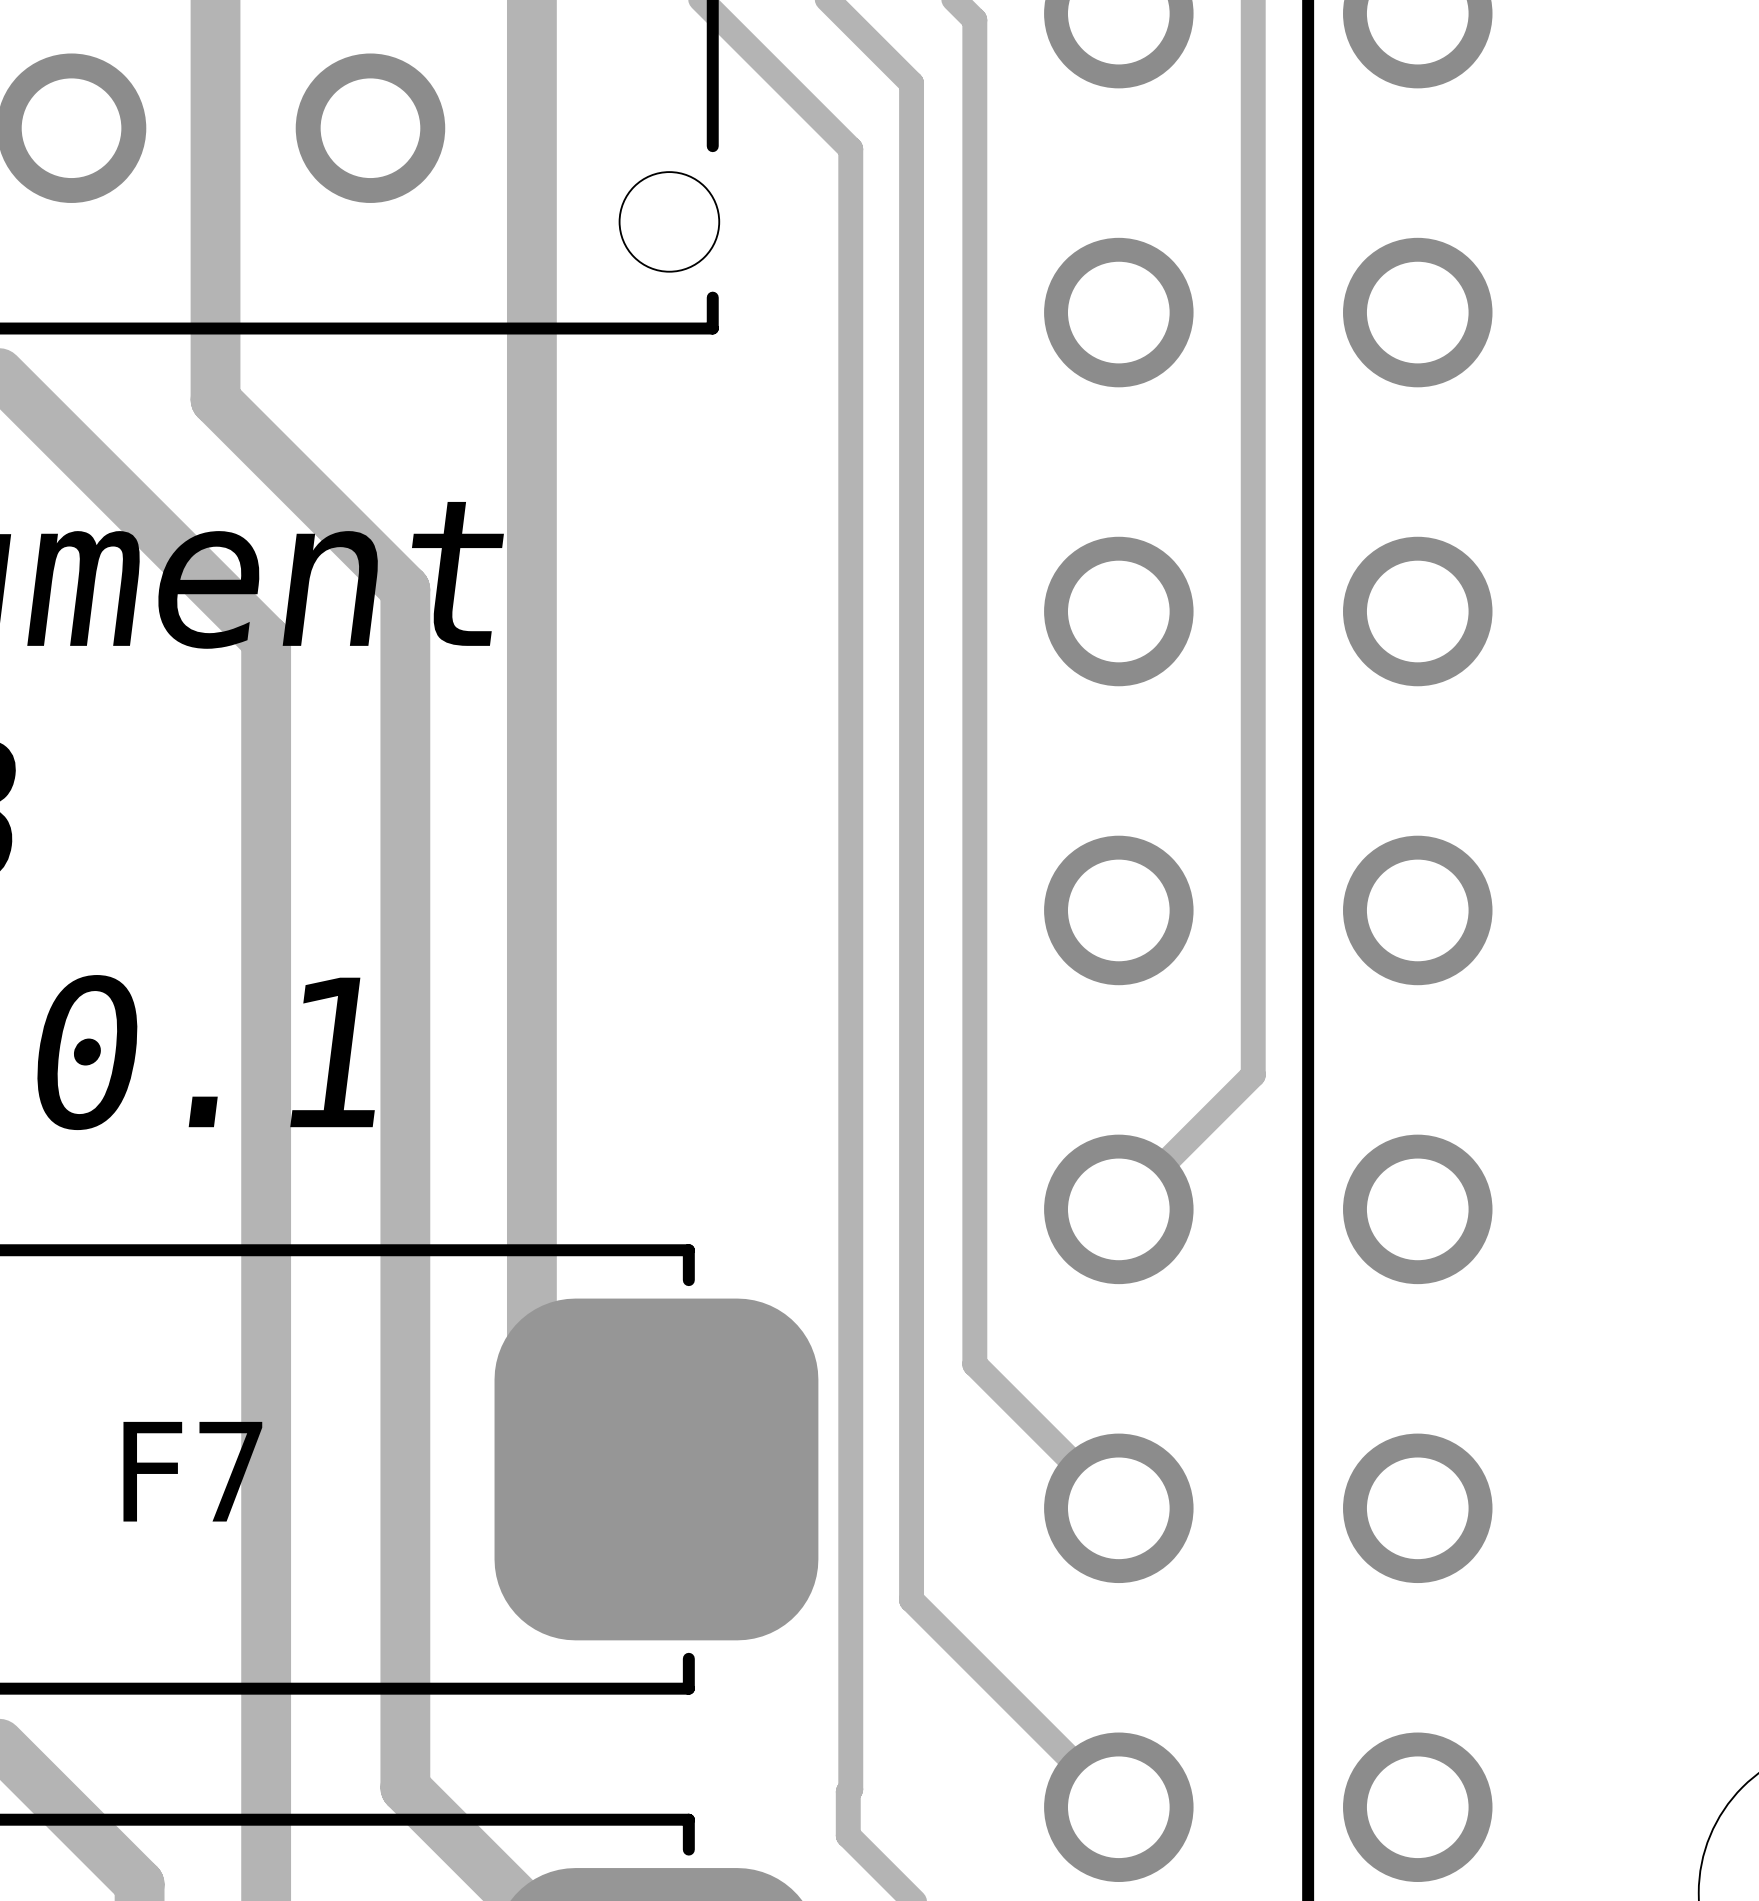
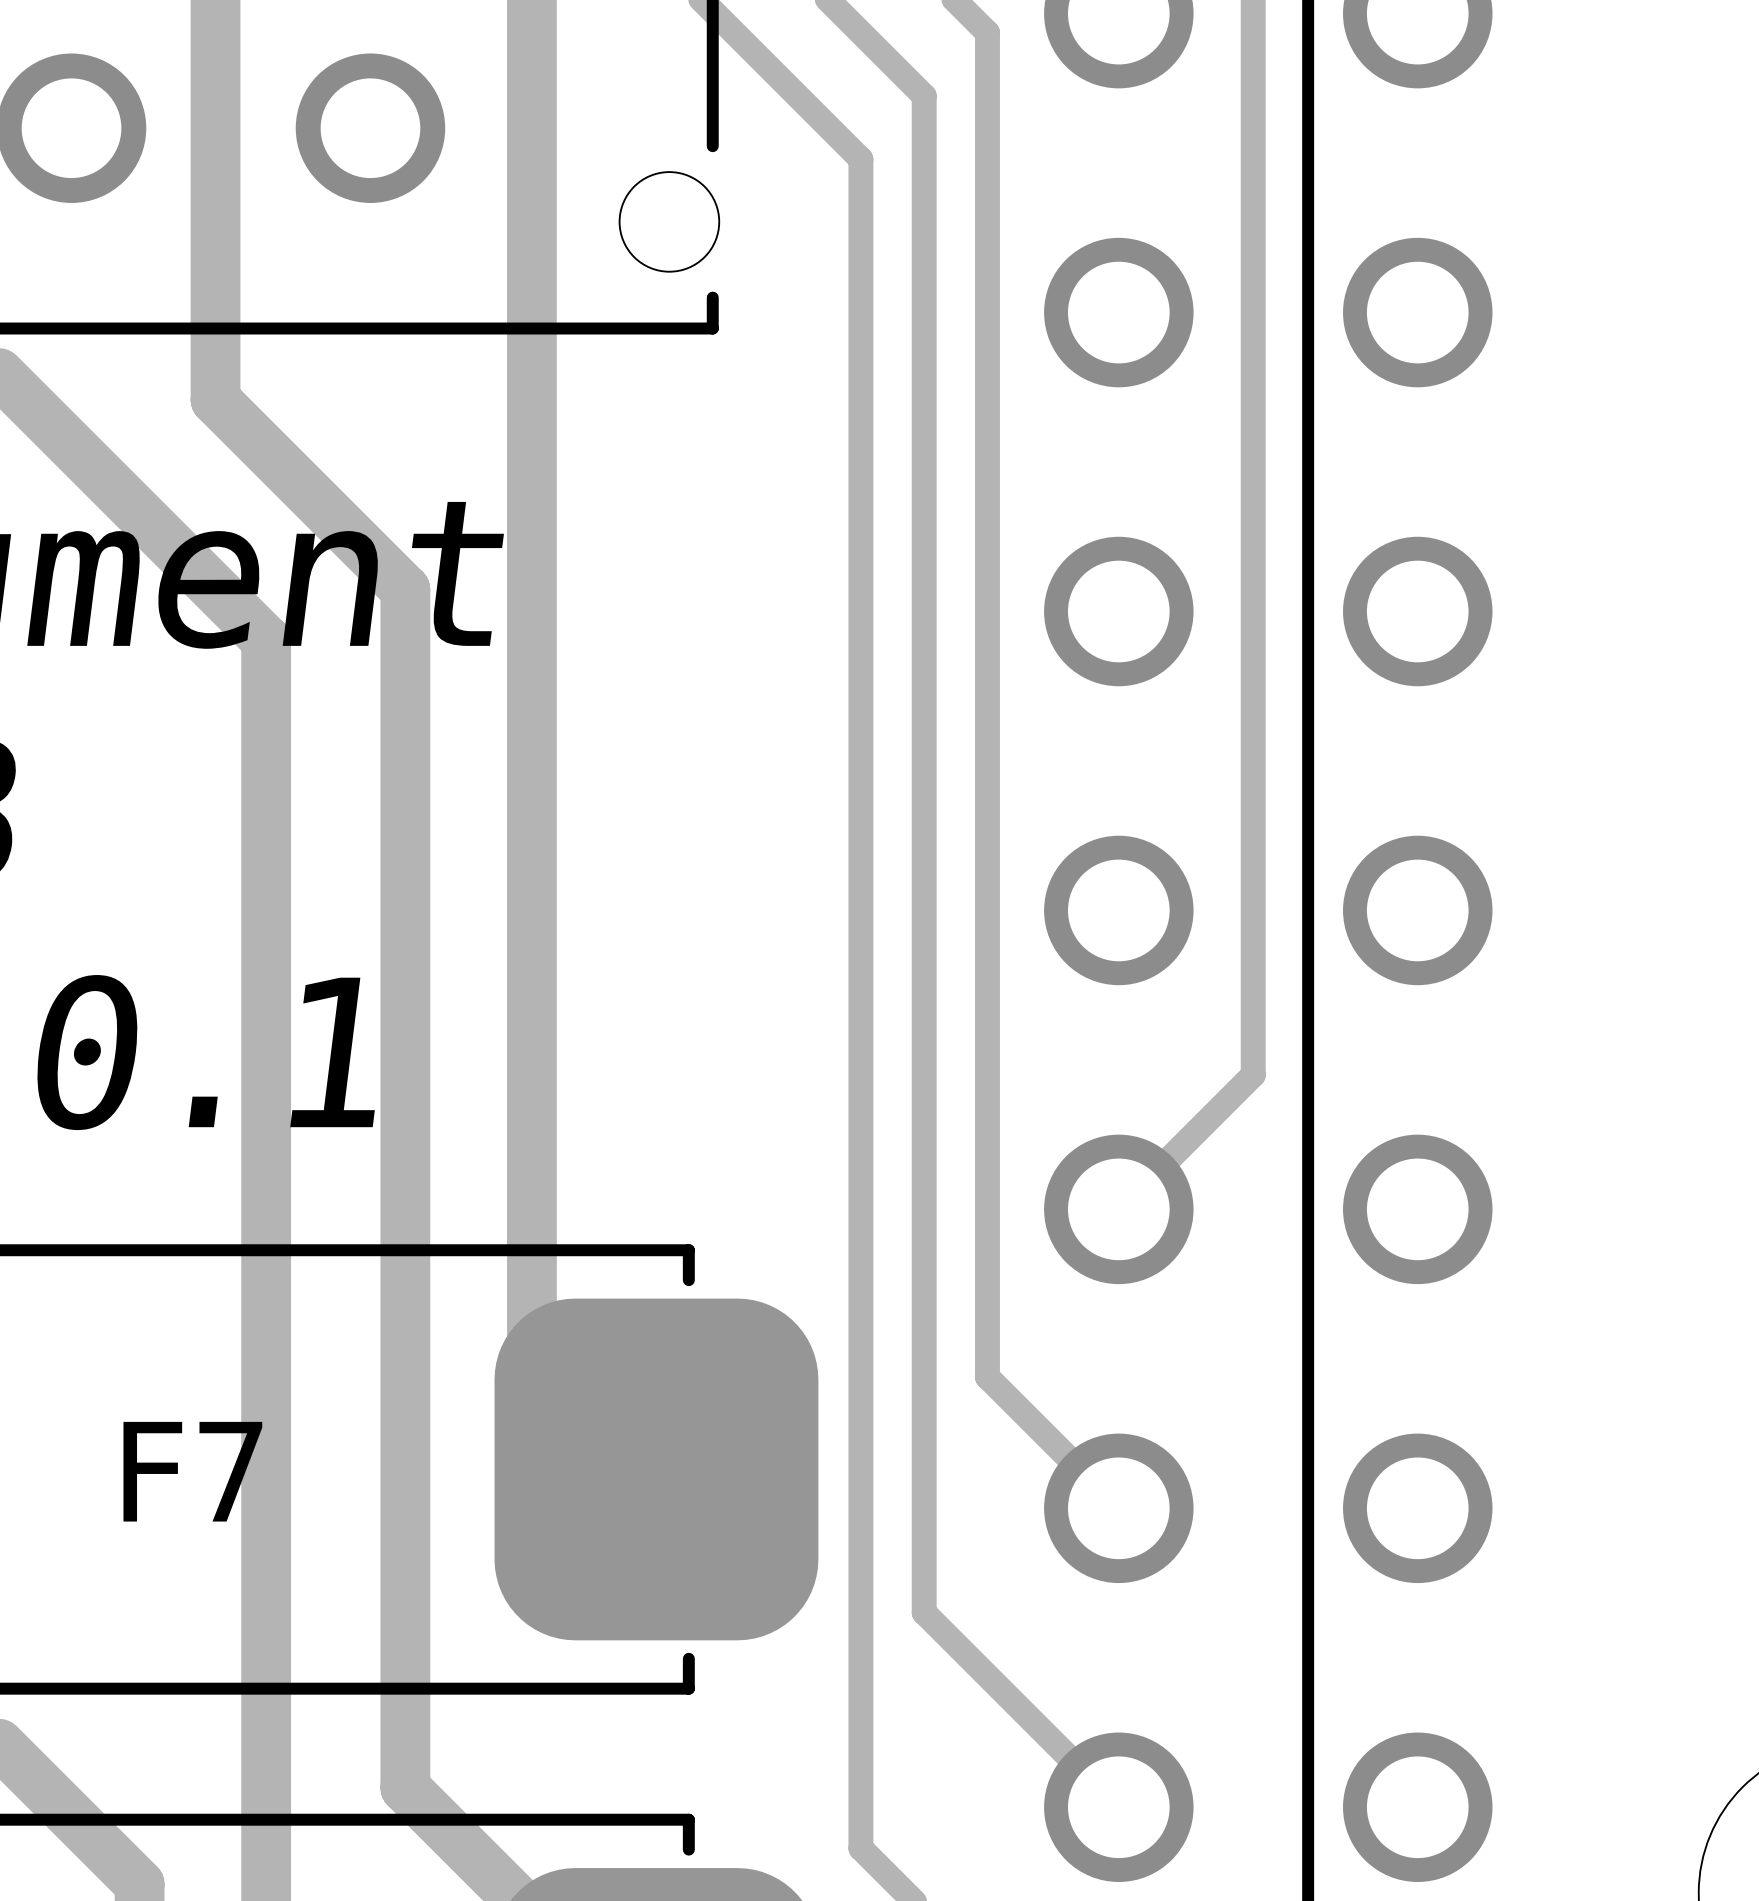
track: (974, 20) (974, 1364) (987, 1376) -> (974, 20) (987, 32) (987, 1376)
track: (911, 83) (911, 1600) (924, 1612) -> (911, 83) (924, 96) (924, 1612)
track: (850, 149) (850, 1789) (848, 1791) (848, 1835) (860, 1848) -> (850, 149) (860, 159) (860, 1848)

